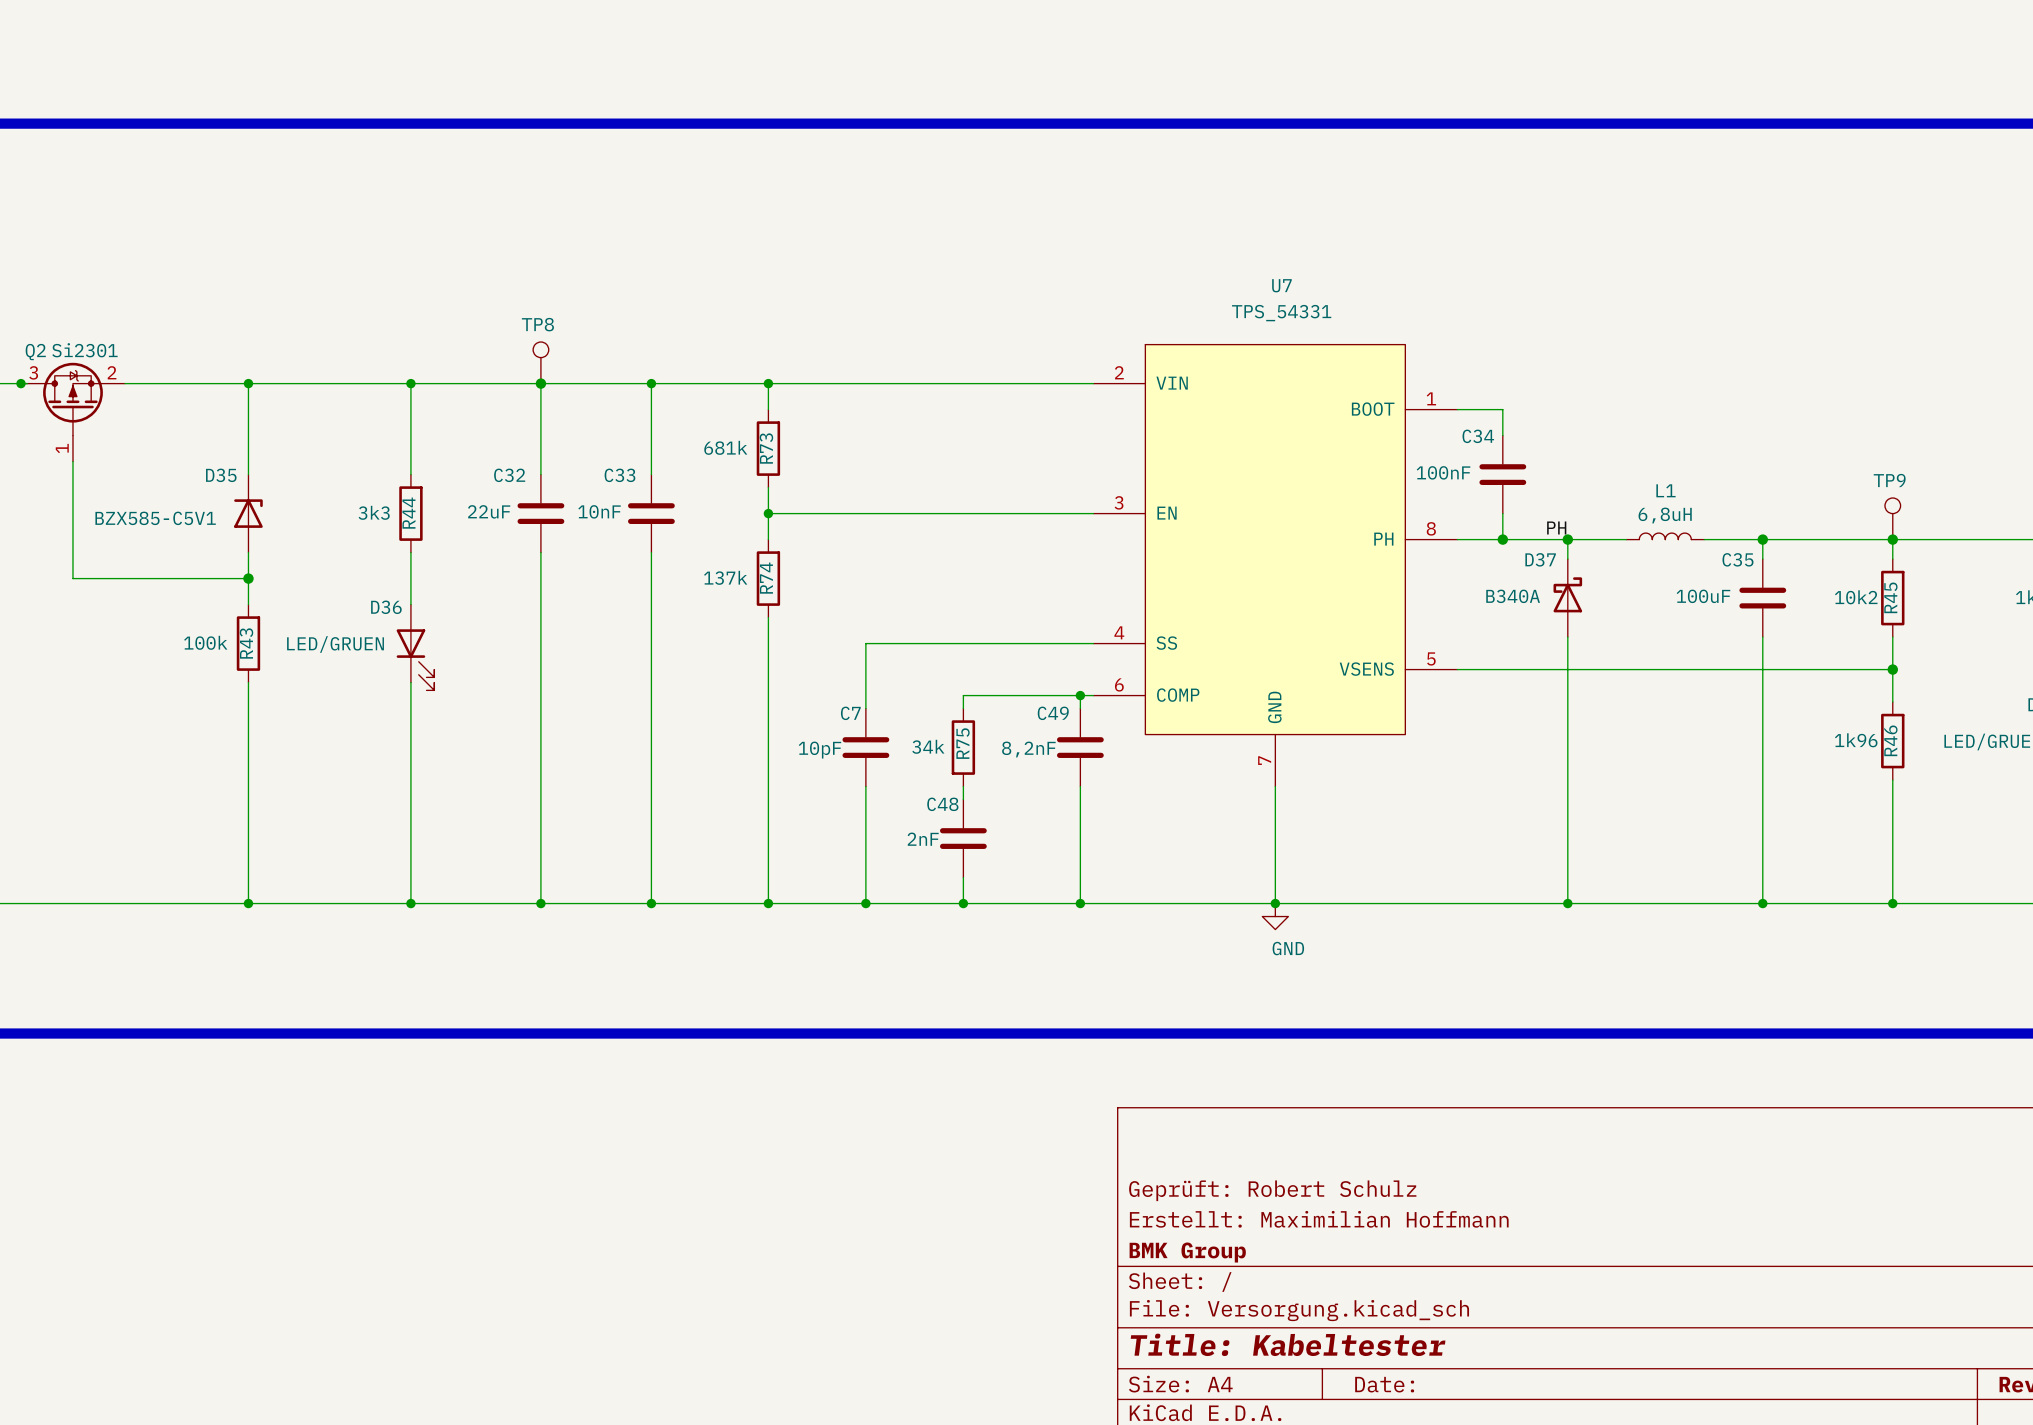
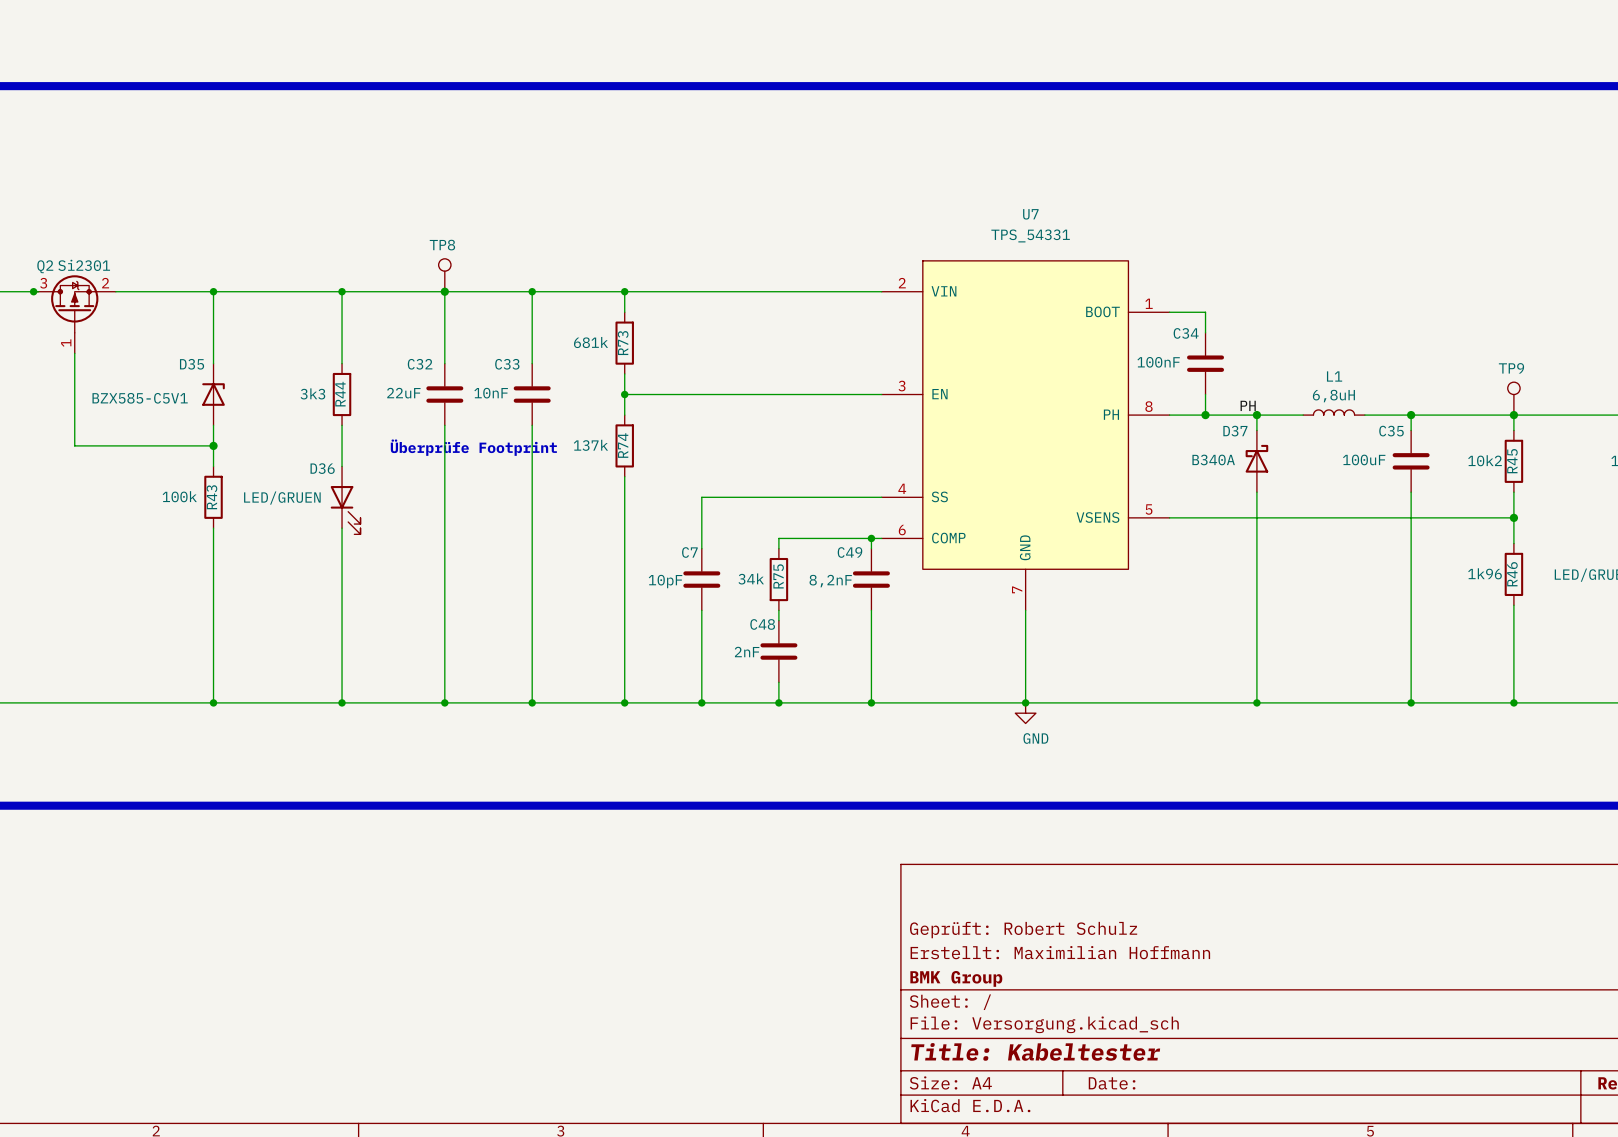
text: none -> Überprüfe Footprint (473, 447)

